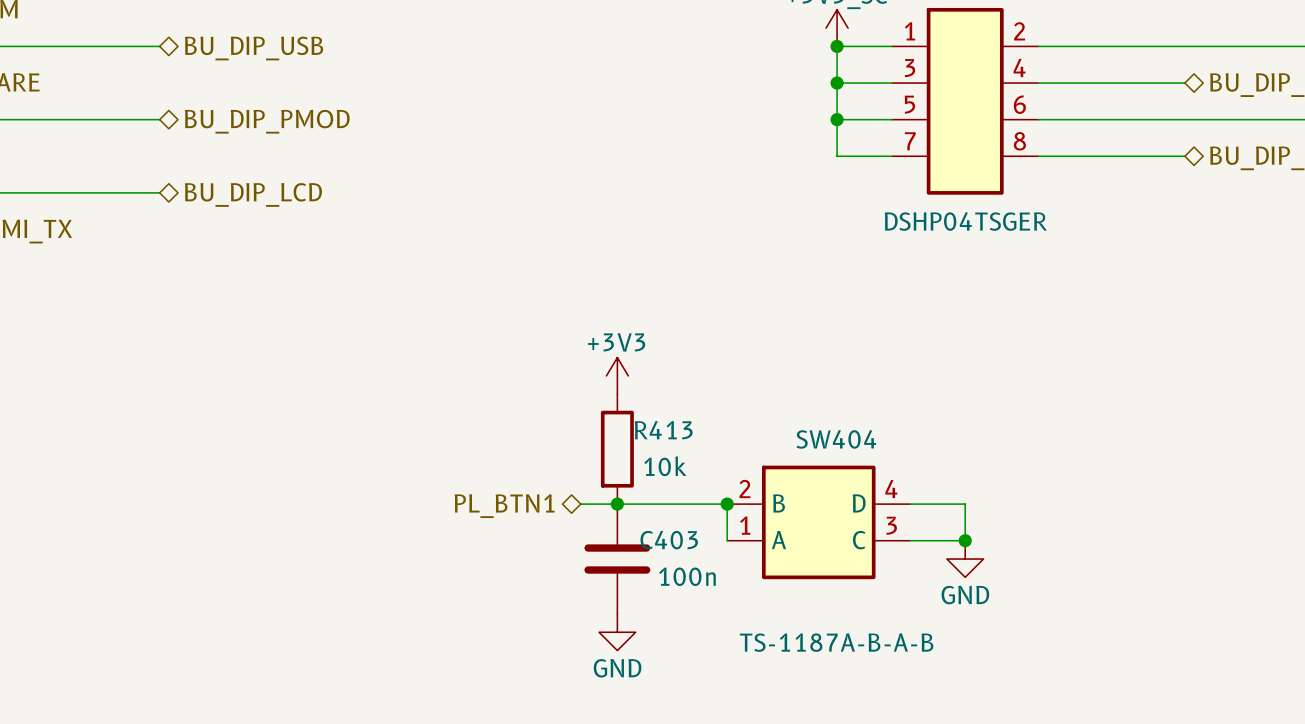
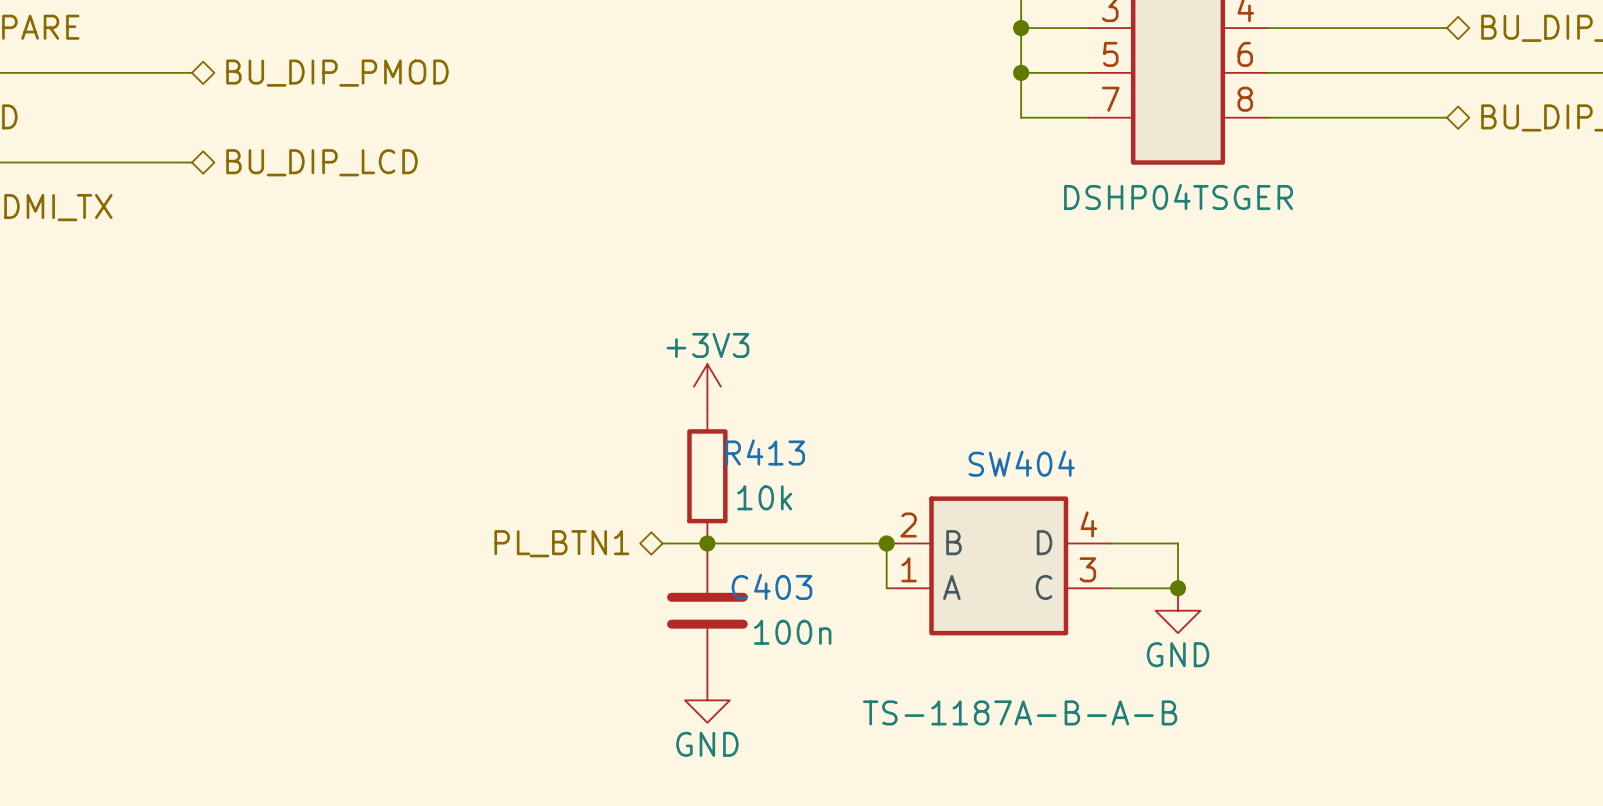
power symbol position: +3V3 (617, 375) -> +3V3 (707, 386)
R413 position: (617, 449) -> (707, 476)
wire: none -> (662, 543) (707, 543)
junction position: (617, 504) -> (707, 543)
hierarchical label position: PL_BTN1 (504, 506) -> PL_BTN1 (561, 543)
C403 position: (617, 559) -> (707, 610)
power symbol position: GND (617, 632) -> GND (707, 700)

